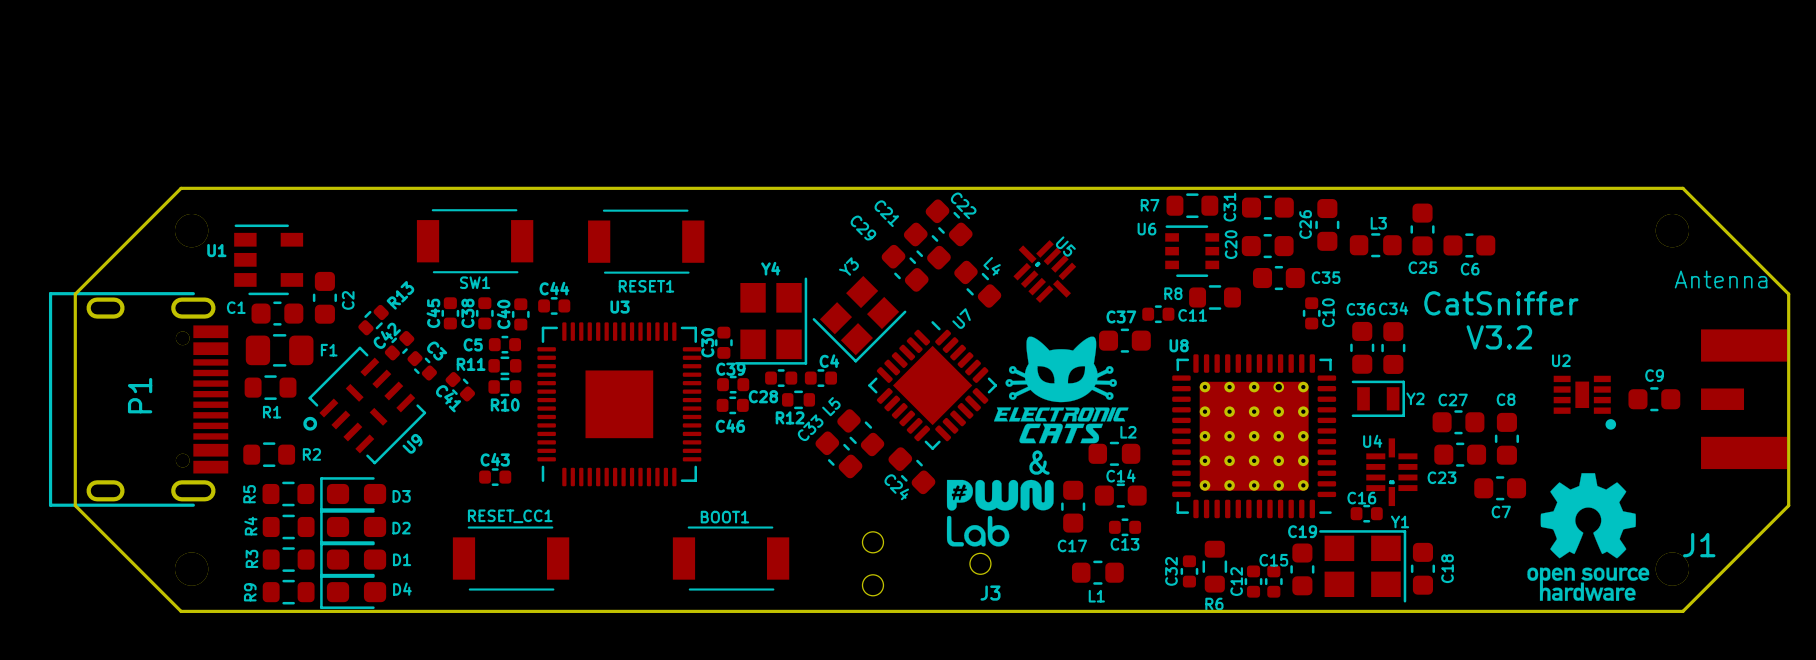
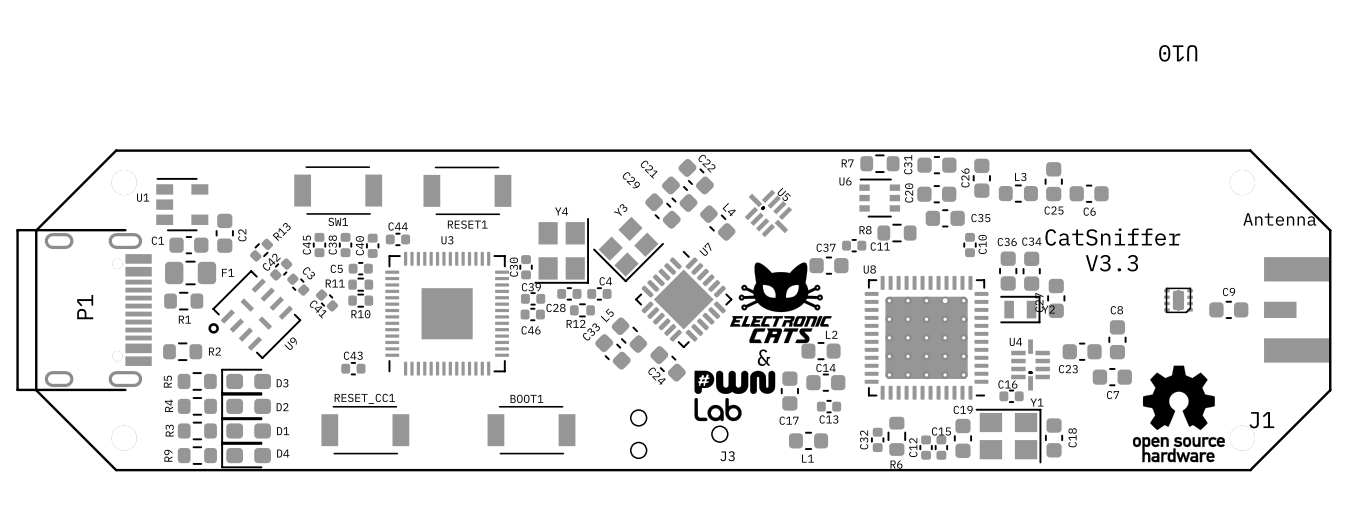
text: V3.2 (1499, 337) -> V3.3 (1111, 263)
U10: none -> (1178, 300)
U2: (1584, 402) -> none
C27 rotation: 0° (1458, 422) -> 90° clockwise (1056, 298)
C27 position: (1458, 422) -> (1056, 298)

